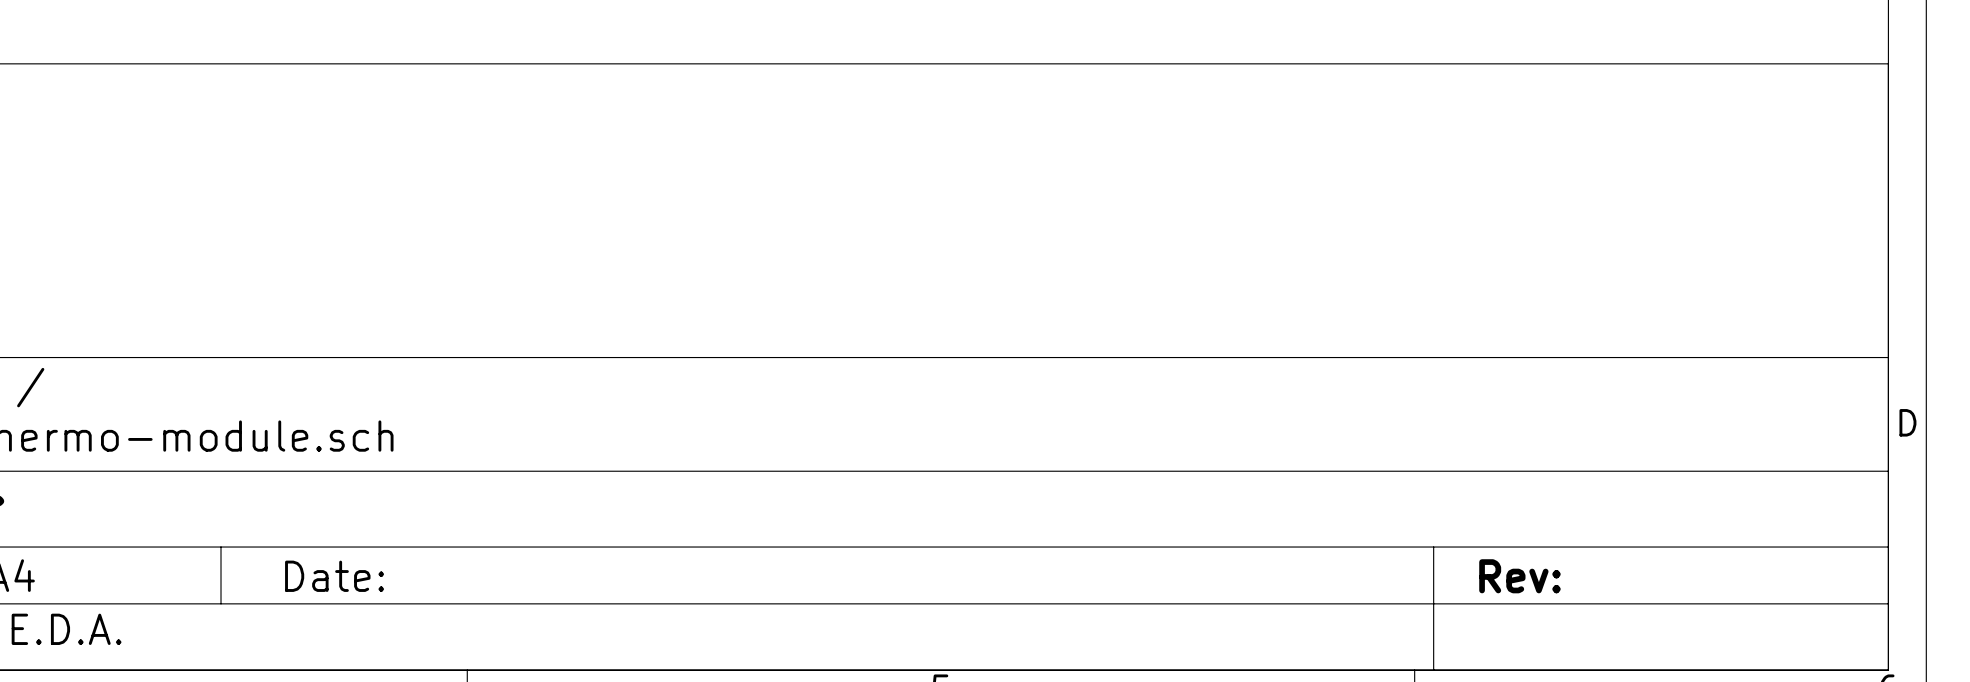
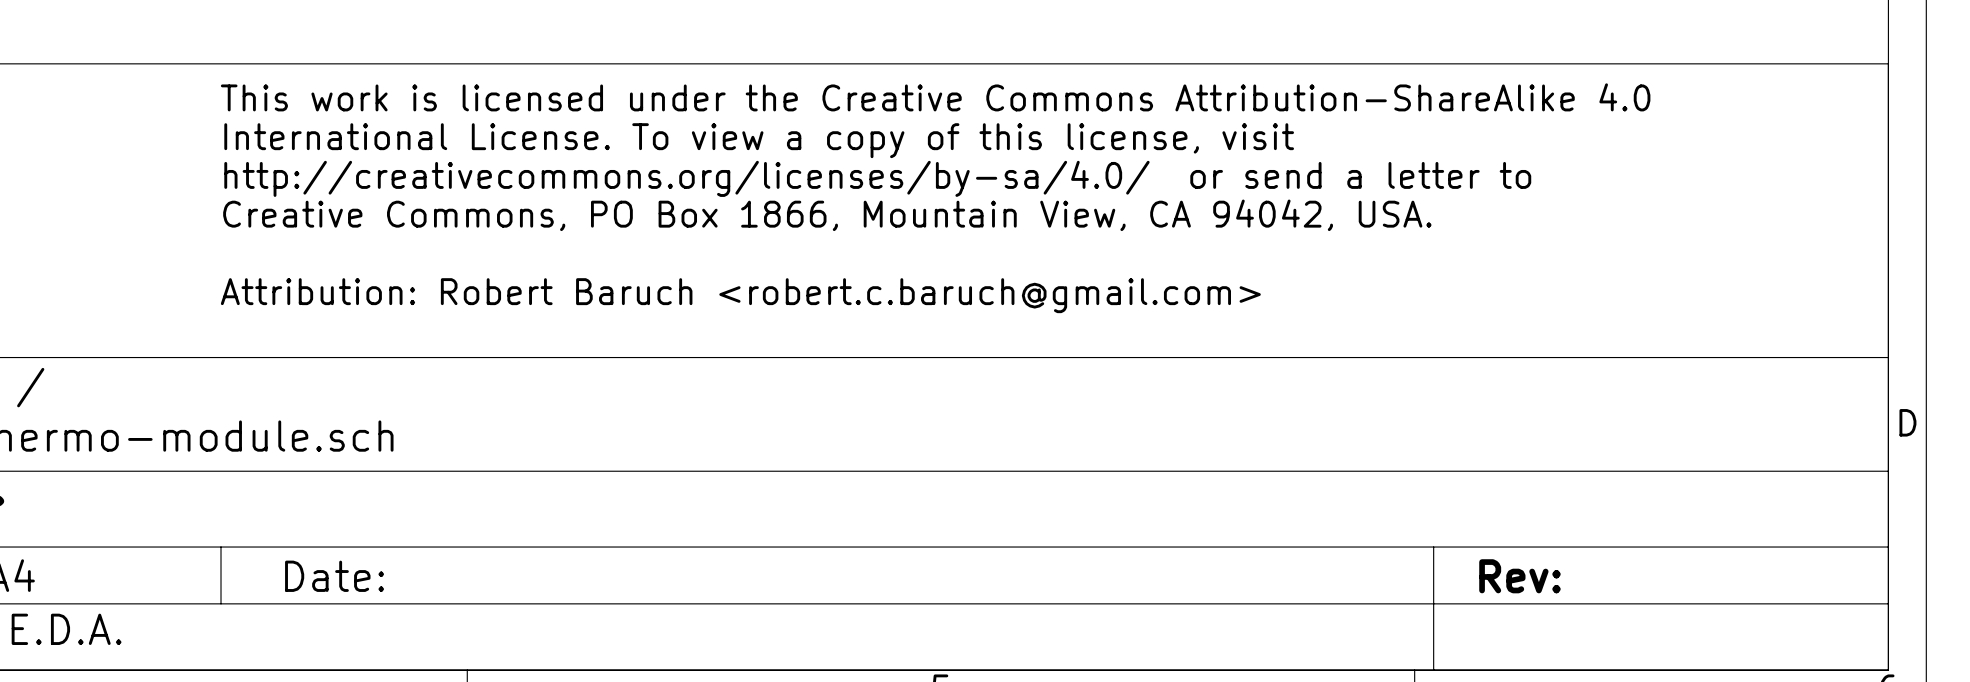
text: none -> This work is licensed under the Creative Commons Attribution-ShareAlike 4.0 (935, 97)
text: none -> International License. To view a copy of this license, visit (759, 140)
text: none -> http://creativecommons.org/licenses/by-sa/4.0/ or send a letter to (877, 178)
text: none -> Creative Commons, PO Box 1866, Mountain View, CA 94042, USA. (827, 215)
text: none -> Attribution: Robert Baruch <robert.c.baruch@gmail.com> (740, 295)

